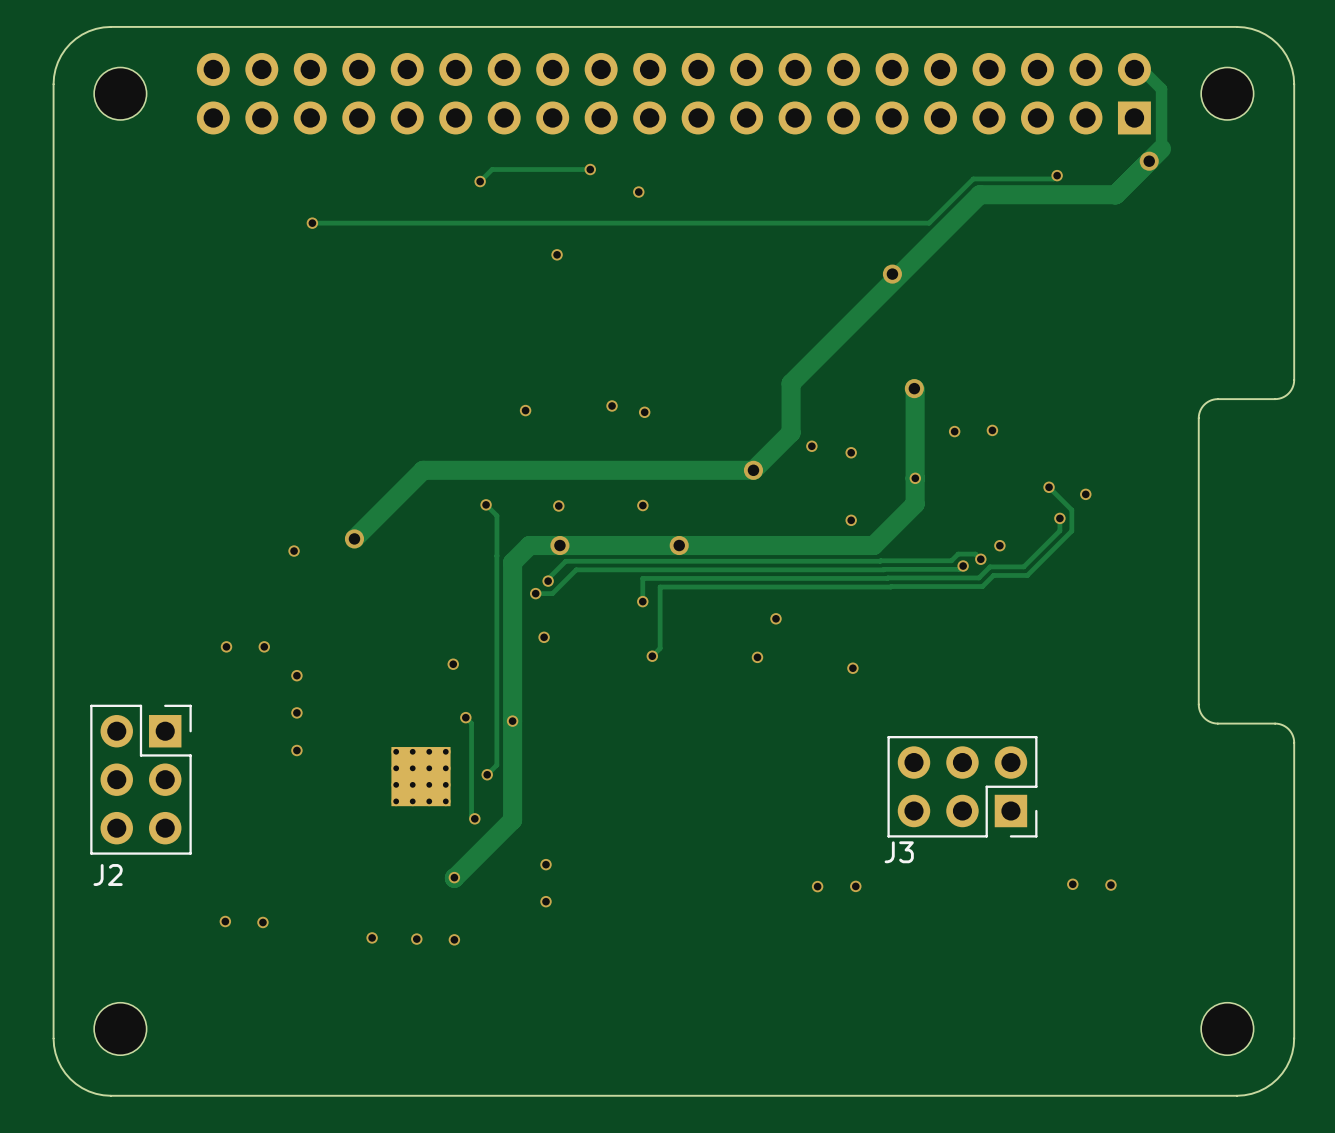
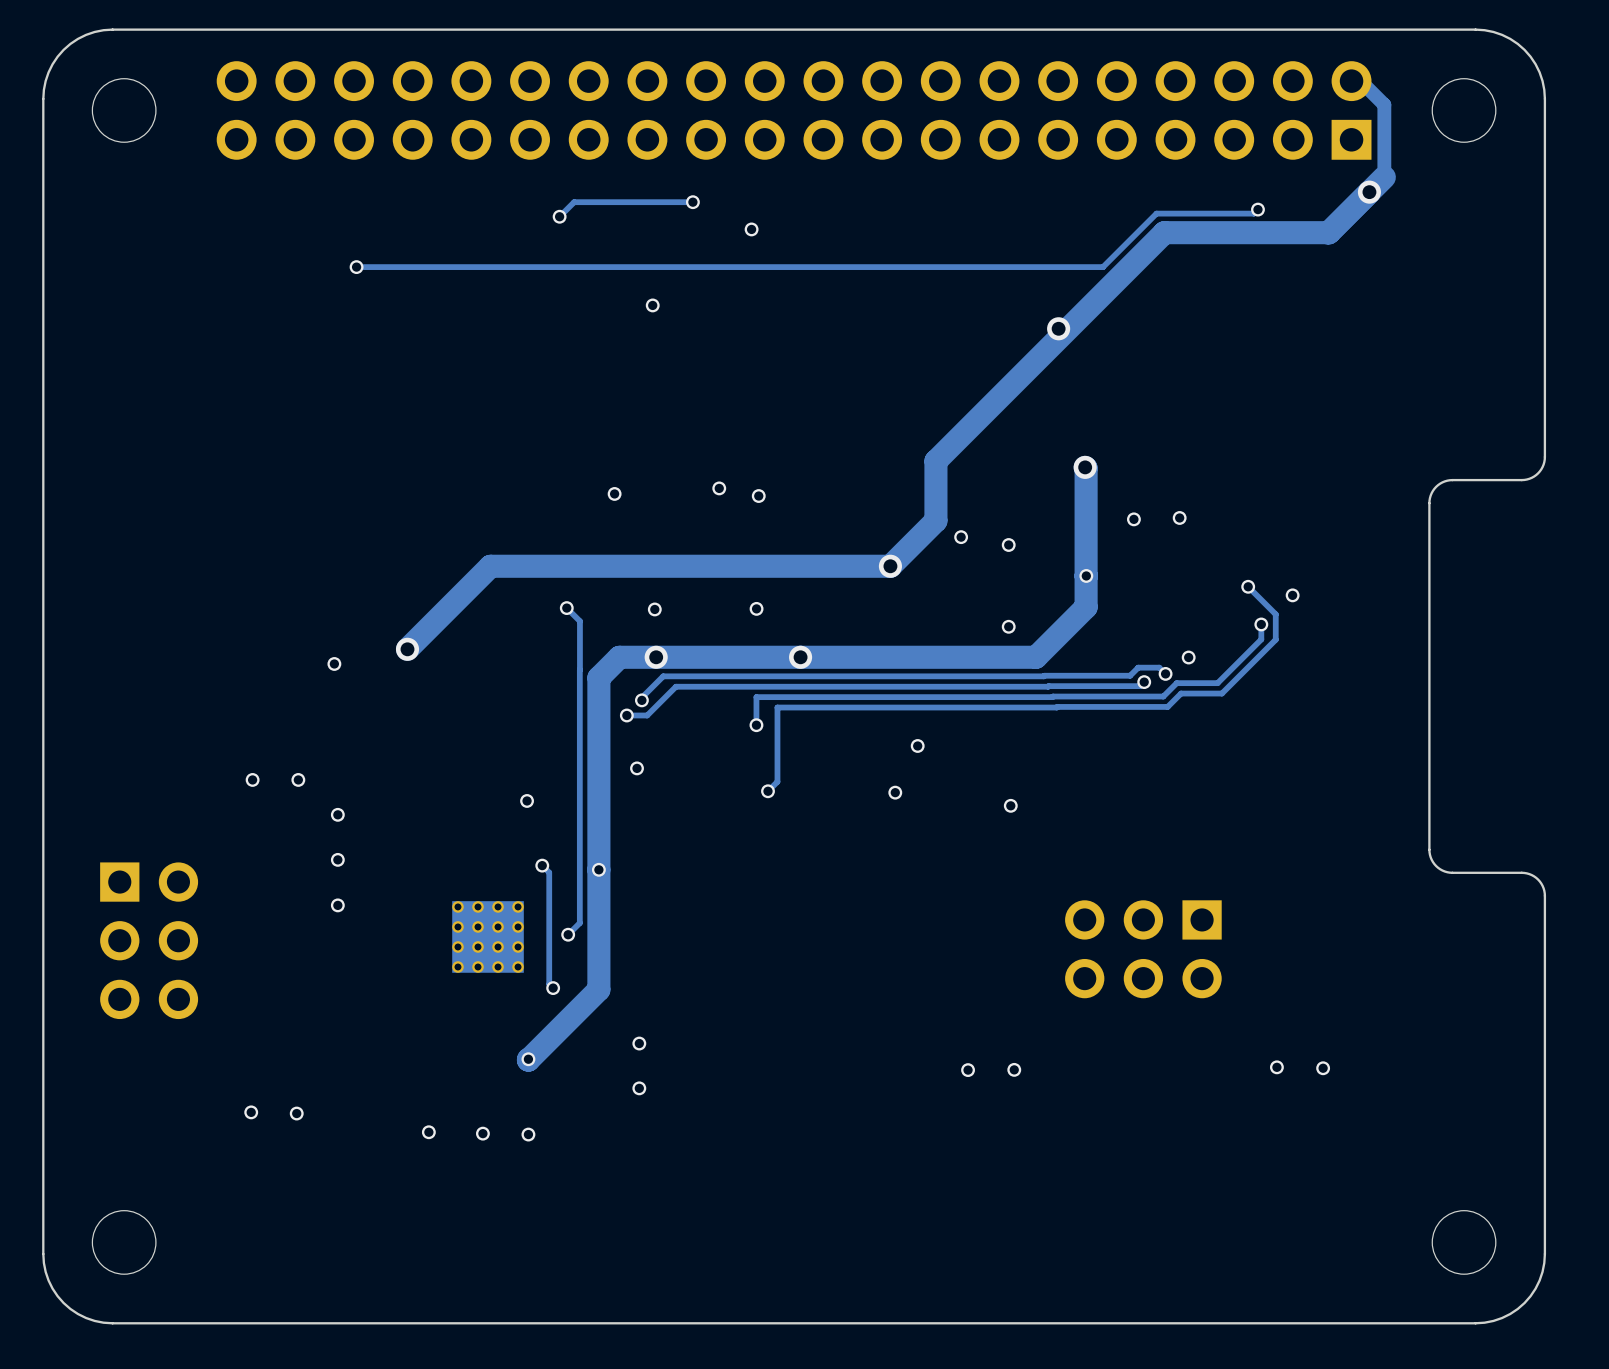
J2 side: bottom (140, 779) -> top (149, 940)
J3 side: bottom (962, 786) -> top (1143, 949)

